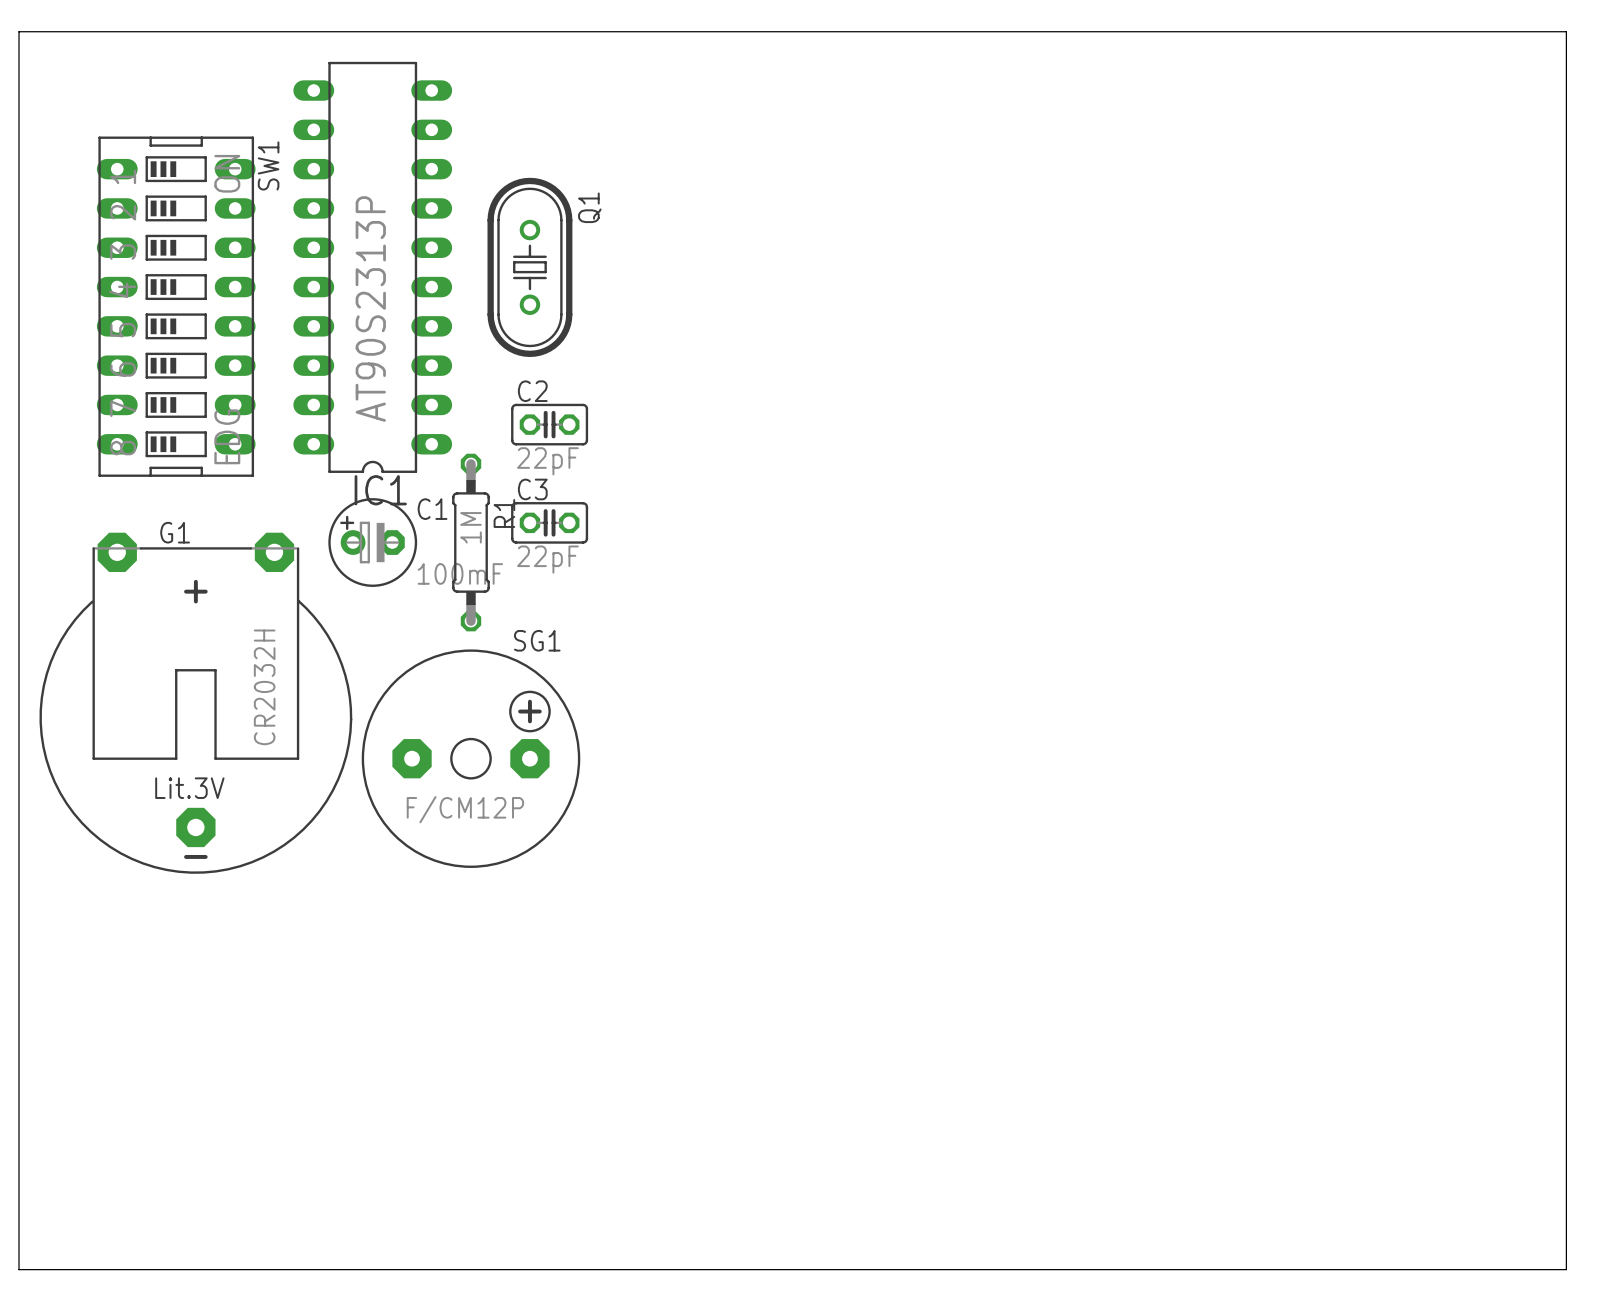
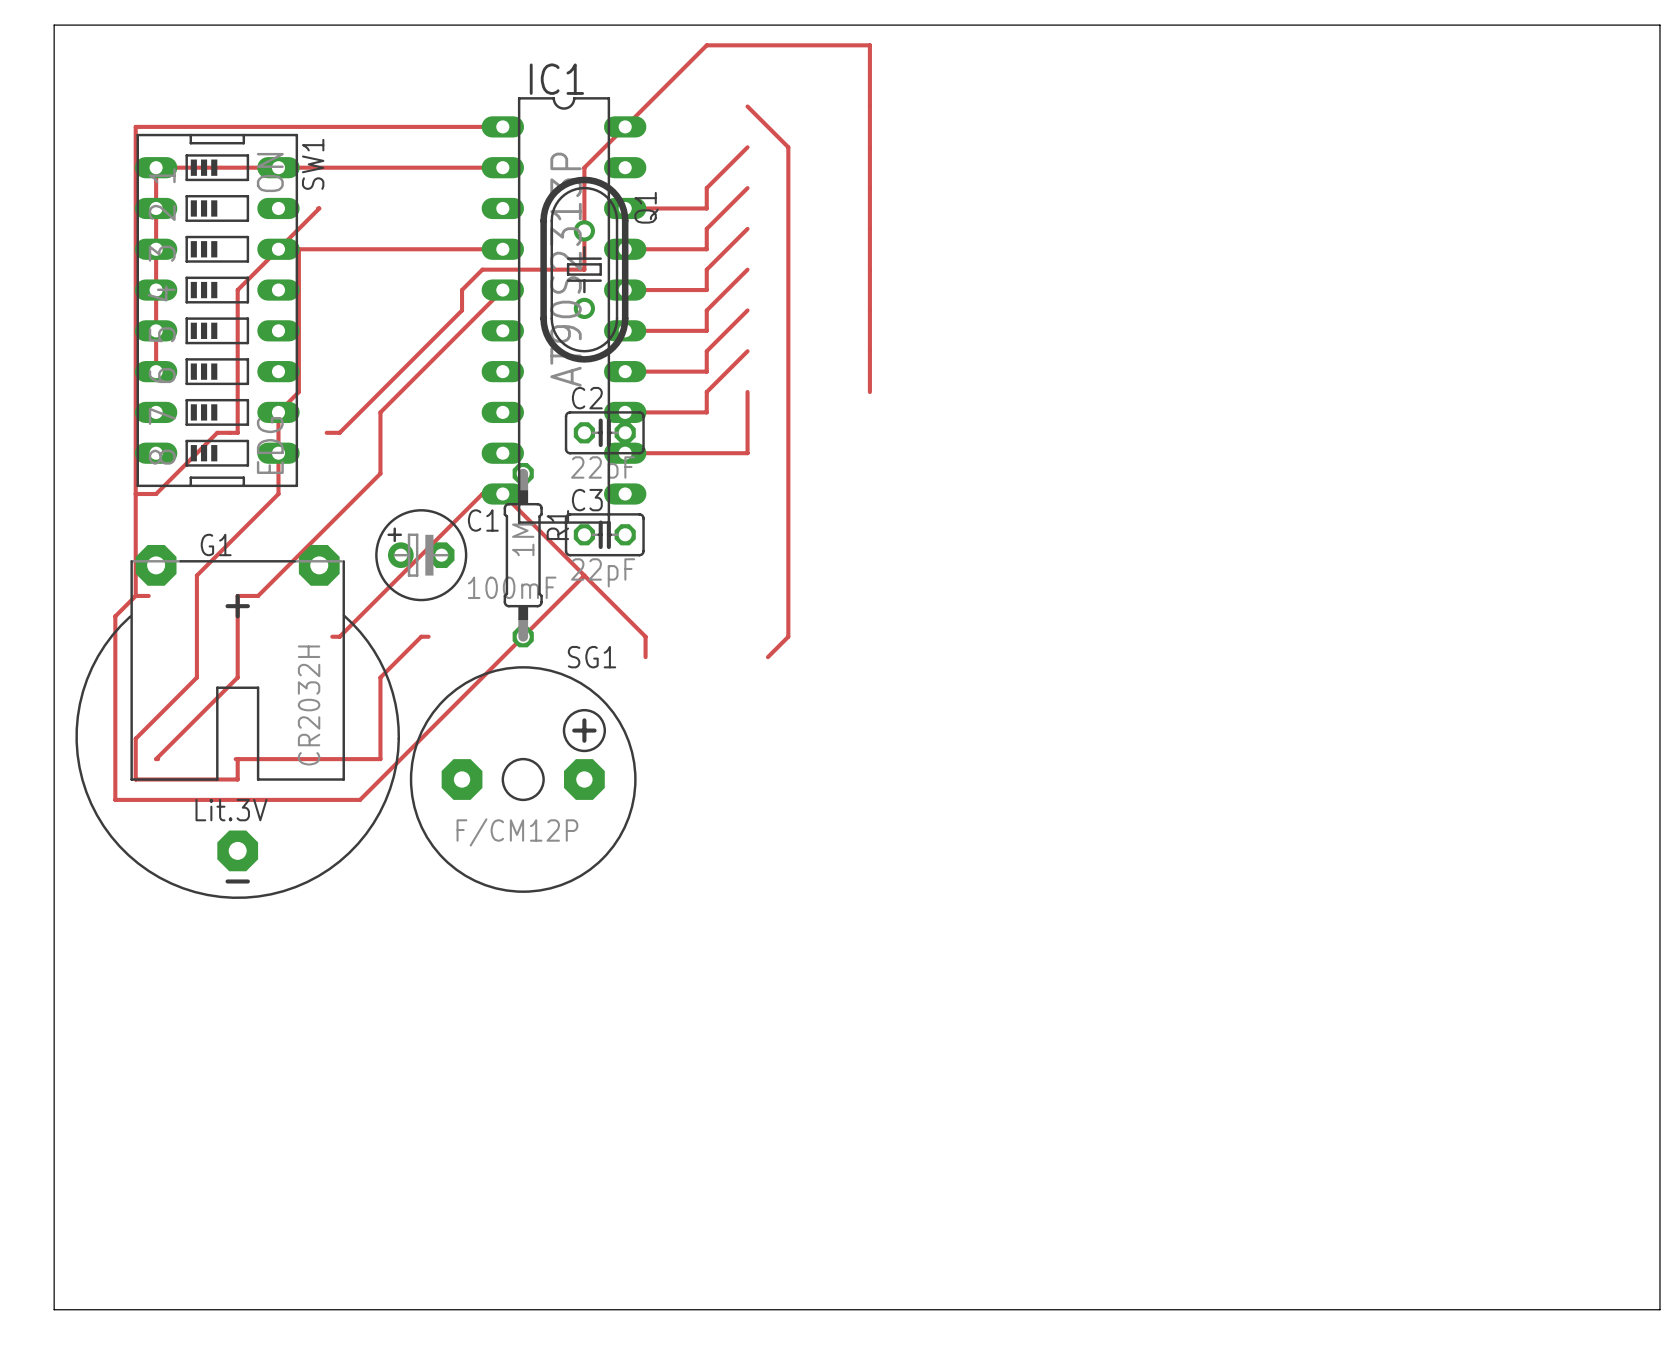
track: none -> (747, 106) (788, 147) (788, 636) (767, 657)
track: none -> (502, 126) (135, 126) (135, 595)
track: none -> (747, 147) (706, 188) (706, 208) (625, 208)
track: none -> (502, 167) (156, 167) (156, 371)
track: none -> (747, 188) (706, 228) (706, 249) (625, 249)
track: none -> (317, 208) (237, 290) (237, 432) (217, 432) (156, 493) (135, 493)
track: none -> (747, 228) (706, 269) (706, 290) (625, 290)
track: none -> (502, 249) (298, 249) (298, 392) (278, 412) (278, 493) (196, 575) (196, 677) (135, 738) (135, 779) (237, 779) (237, 759)
IC1 rotation: 0° (372, 267) -> 180° (564, 310)
track: none -> (747, 269) (706, 310) (706, 330) (625, 330)
track: none -> (502, 290) (380, 412) (380, 473) (258, 595) (237, 595) (237, 677) (156, 759) (158, 759)
track: none -> (747, 310) (706, 351) (706, 371) (625, 371)
track: none -> (747, 351) (706, 392) (706, 412) (625, 412)
track: none -> (747, 392) (747, 453) (625, 453)
track: none -> (869, 392) (869, 45) (706, 45) (584, 167) (584, 269) (482, 269) (462, 290) (462, 310) (339, 432) (326, 432)
track: none -> (584, 575) (360, 799) (115, 799) (115, 616) (135, 595)
track: none -> (135, 595) (148, 595)
track: none -> (332, 636) (339, 636) (482, 493) (502, 493) (645, 636) (645, 657)
track: none -> (428, 636) (421, 636) (380, 677) (380, 759) (235, 759)

